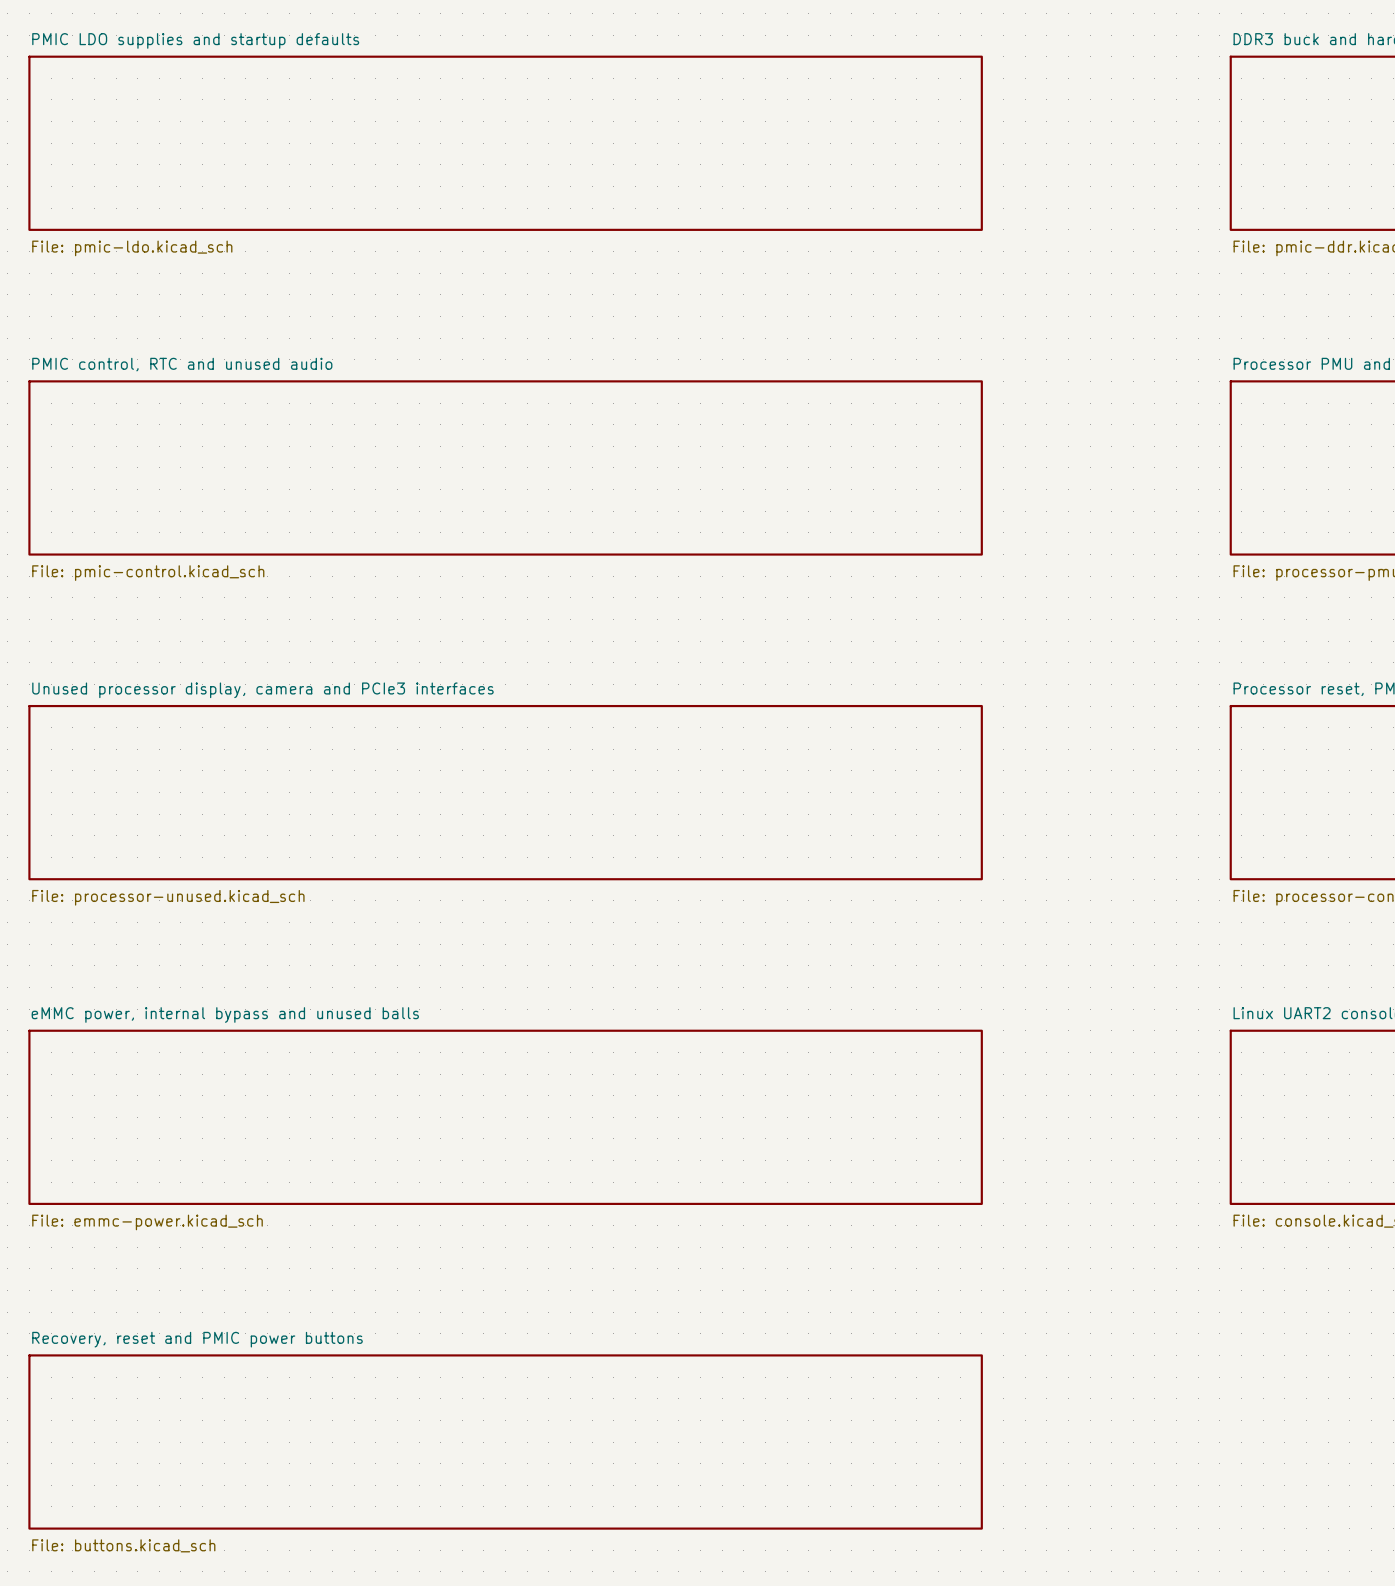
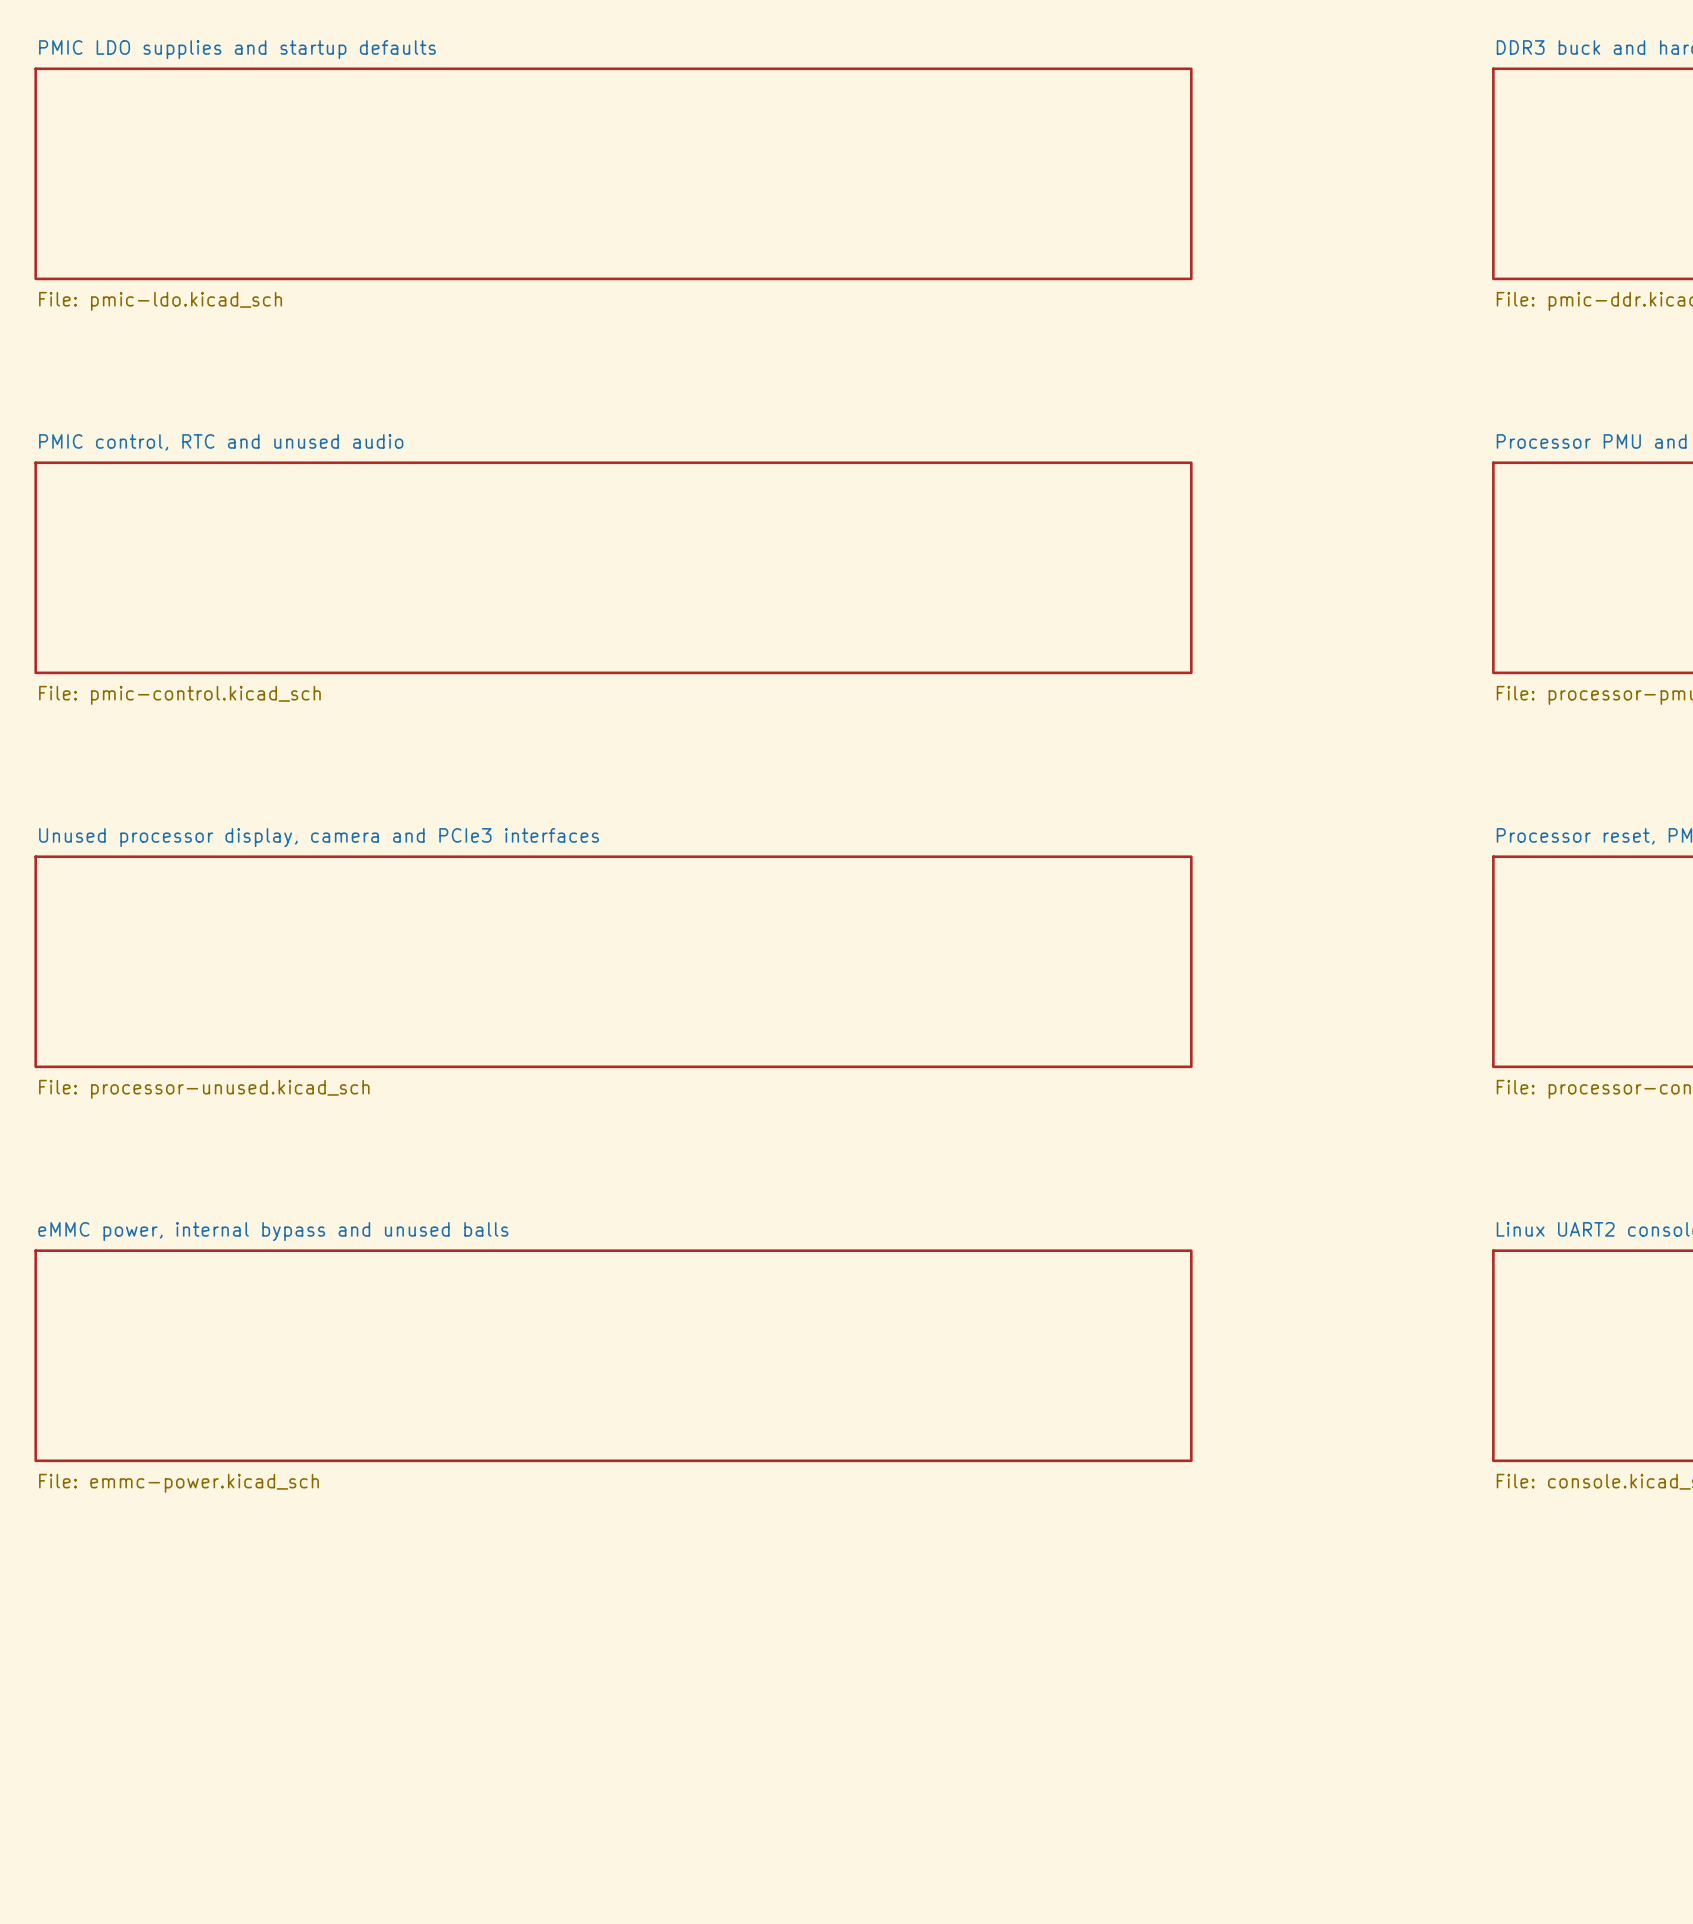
sheet Recovery, reset and PMIC power buttons: File: buttons.kicad_sch (505, 1442) -> none

